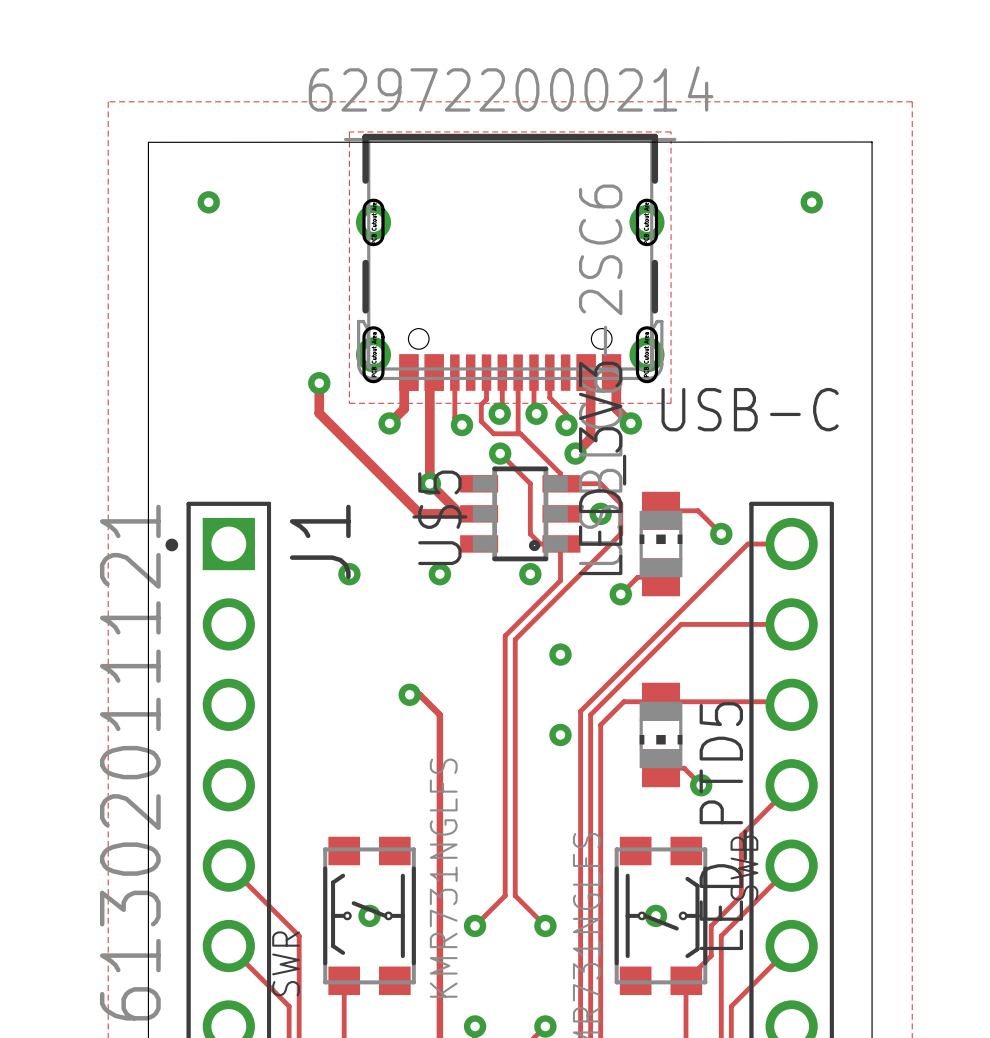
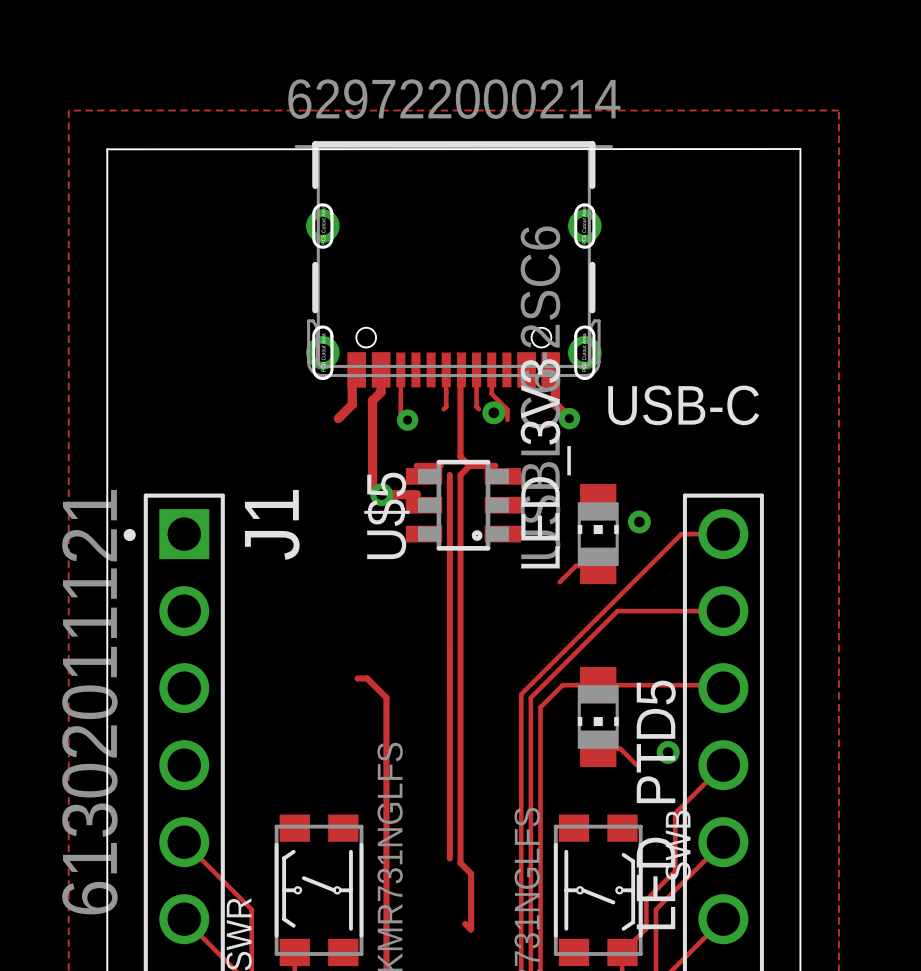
zone outline: (349, 131) (349, 403) (671, 403) (671, 131) (349, 131) -> none
via: (208, 202) -> none
via: (811, 202) -> none
track: (486, 372) (486, 399) (481, 404) (481, 421) (493, 433) (520, 433) (560, 473) (561, 483) (600, 483) (620, 503) (620, 533) (515, 639) (515, 895) (545, 925) -> none
track: (518, 372) (518, 433) -> (461, 369) (459, 371) (460, 456) (469, 465)
track: (590, 372) (590, 438) (575, 453) -> none
track: (434, 377) (429, 381) (429, 483) (459, 513) -> (381, 374) (381, 392) (372, 400) (372, 485) (381, 494) (416, 494)
track: (319, 383) (319, 413) (419, 513) (479, 513) -> none
via: (319, 383) -> none
via: (499, 413) -> none
via: (536, 413) -> none
via: none -> (493, 412)
via: (389, 423) -> none
via: (566, 425) -> none
track: (500, 453) (530, 483) (530, 533) (540, 544) (561, 544) -> none
via: (500, 453) -> none
via: (575, 453) -> none
track: none -> (416, 465) (440, 465)
track: none -> (469, 465) (460, 474) (460, 863) (471, 873) (471, 929)
track: none -> (469, 465) (495, 465)
track: none -> (449, 474) (449, 858)
via position: (429, 483) -> (381, 494)
track: (660, 510) (698, 510) (721, 533) -> none
via: (600, 513) -> none
via position: (721, 533) -> (639, 521)
track: (561, 543) (560, 580) (505, 635) (505, 895) (475, 925) -> none
via: (349, 574) -> none
via: (439, 574) -> none
via: (530, 574) -> none
via: (620, 594) -> none
via: (560, 654) -> none
via: (409, 694) -> none
via: (560, 734) -> none
via: none -> (668, 752)
via: (701, 785) -> none
via: (369, 915) -> none
via: (655, 915) -> none
via: (475, 925) -> none
via: (545, 925) -> none
track: none -> (465, 923) (470, 929)

